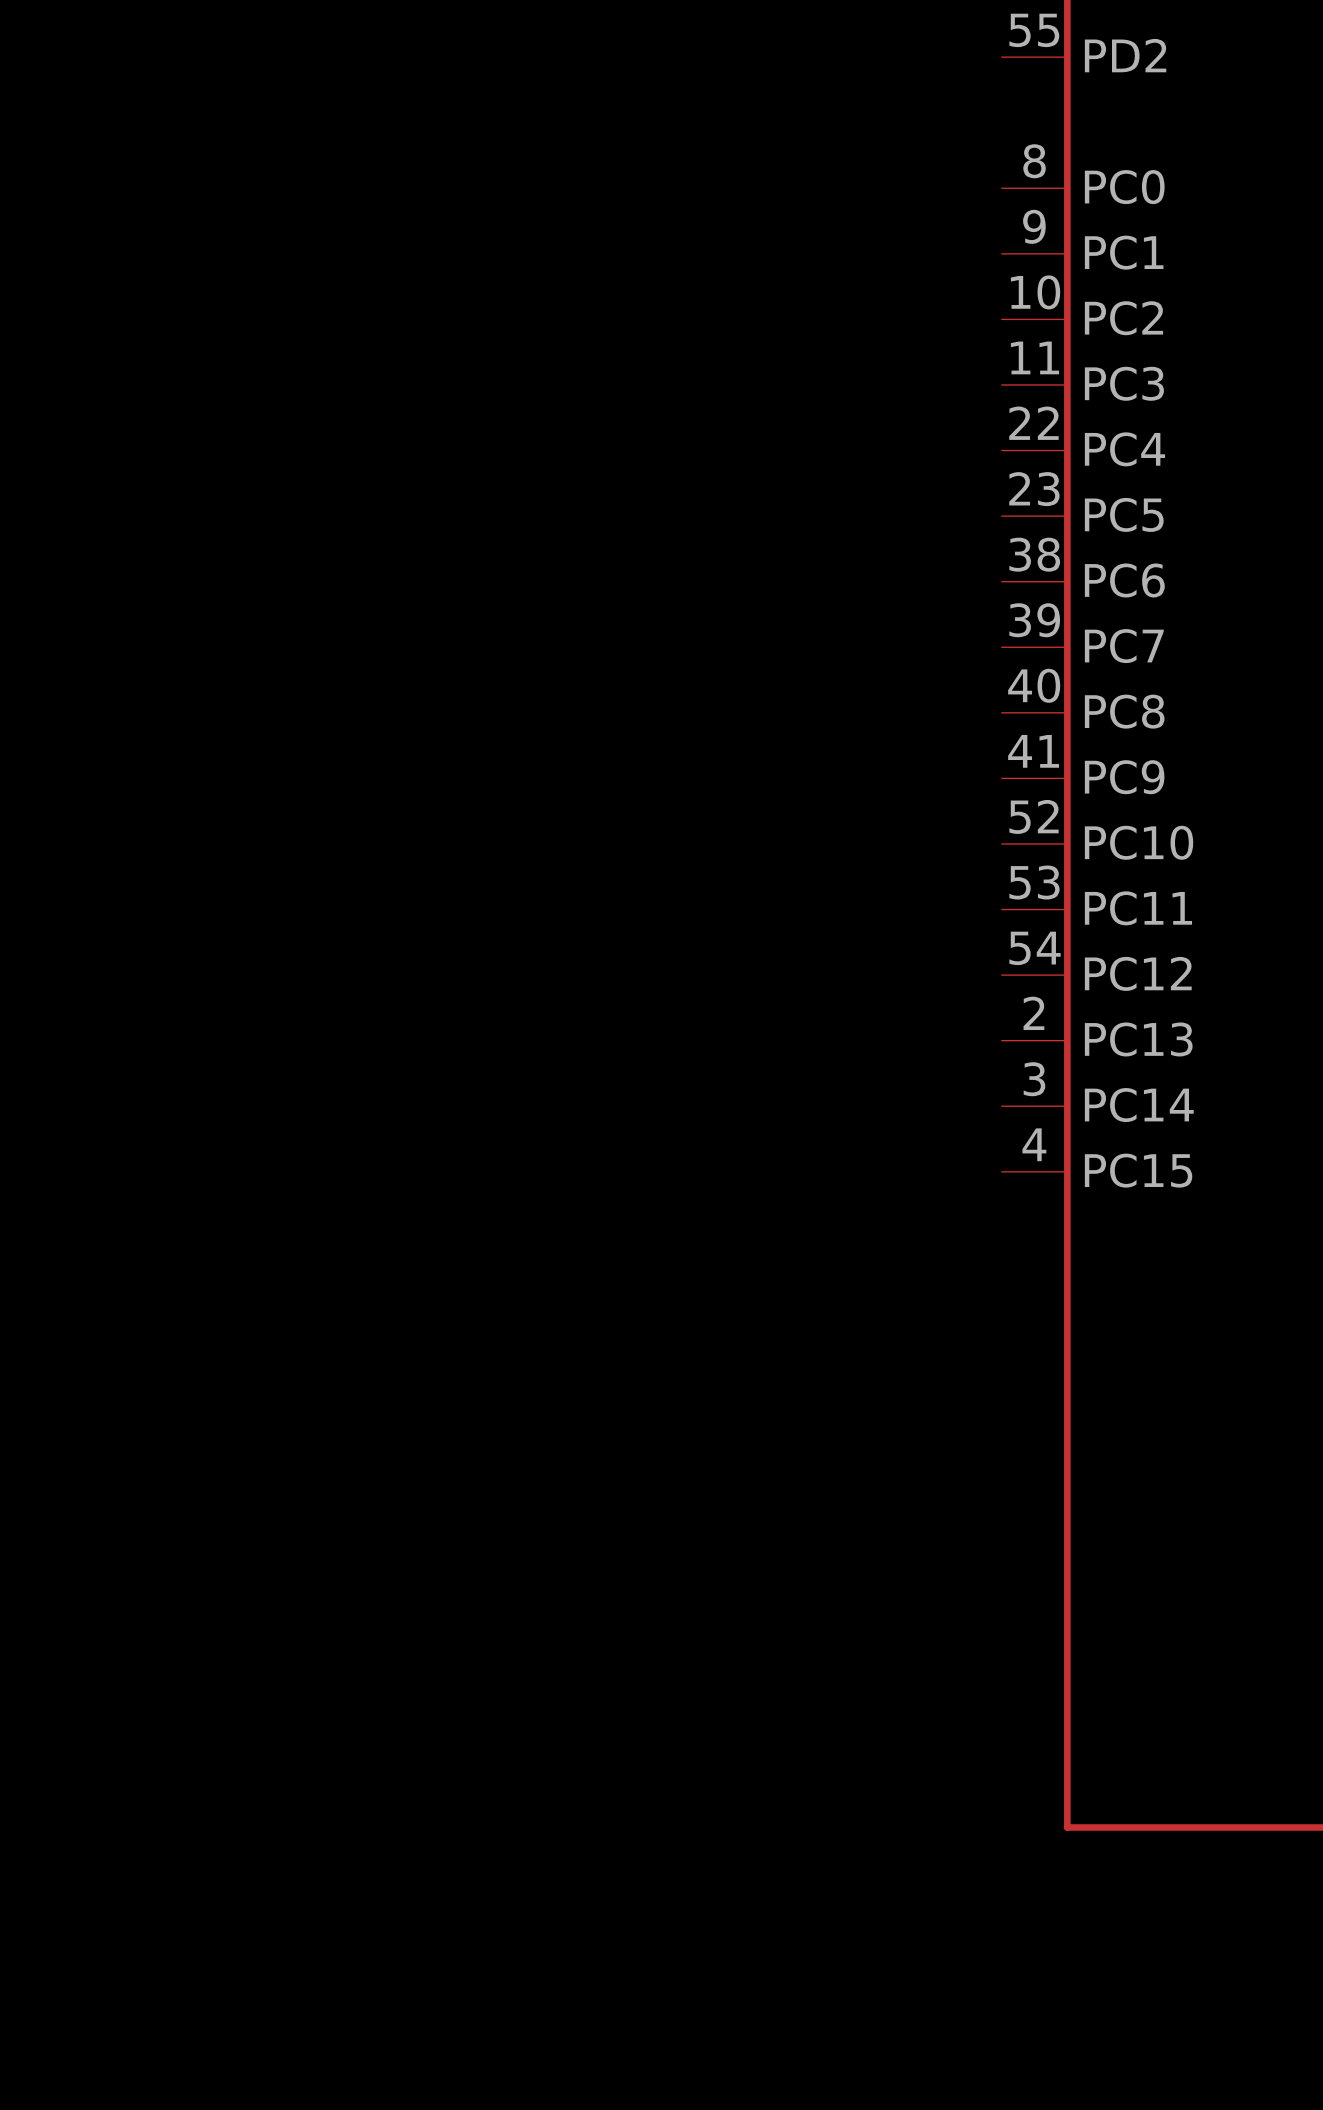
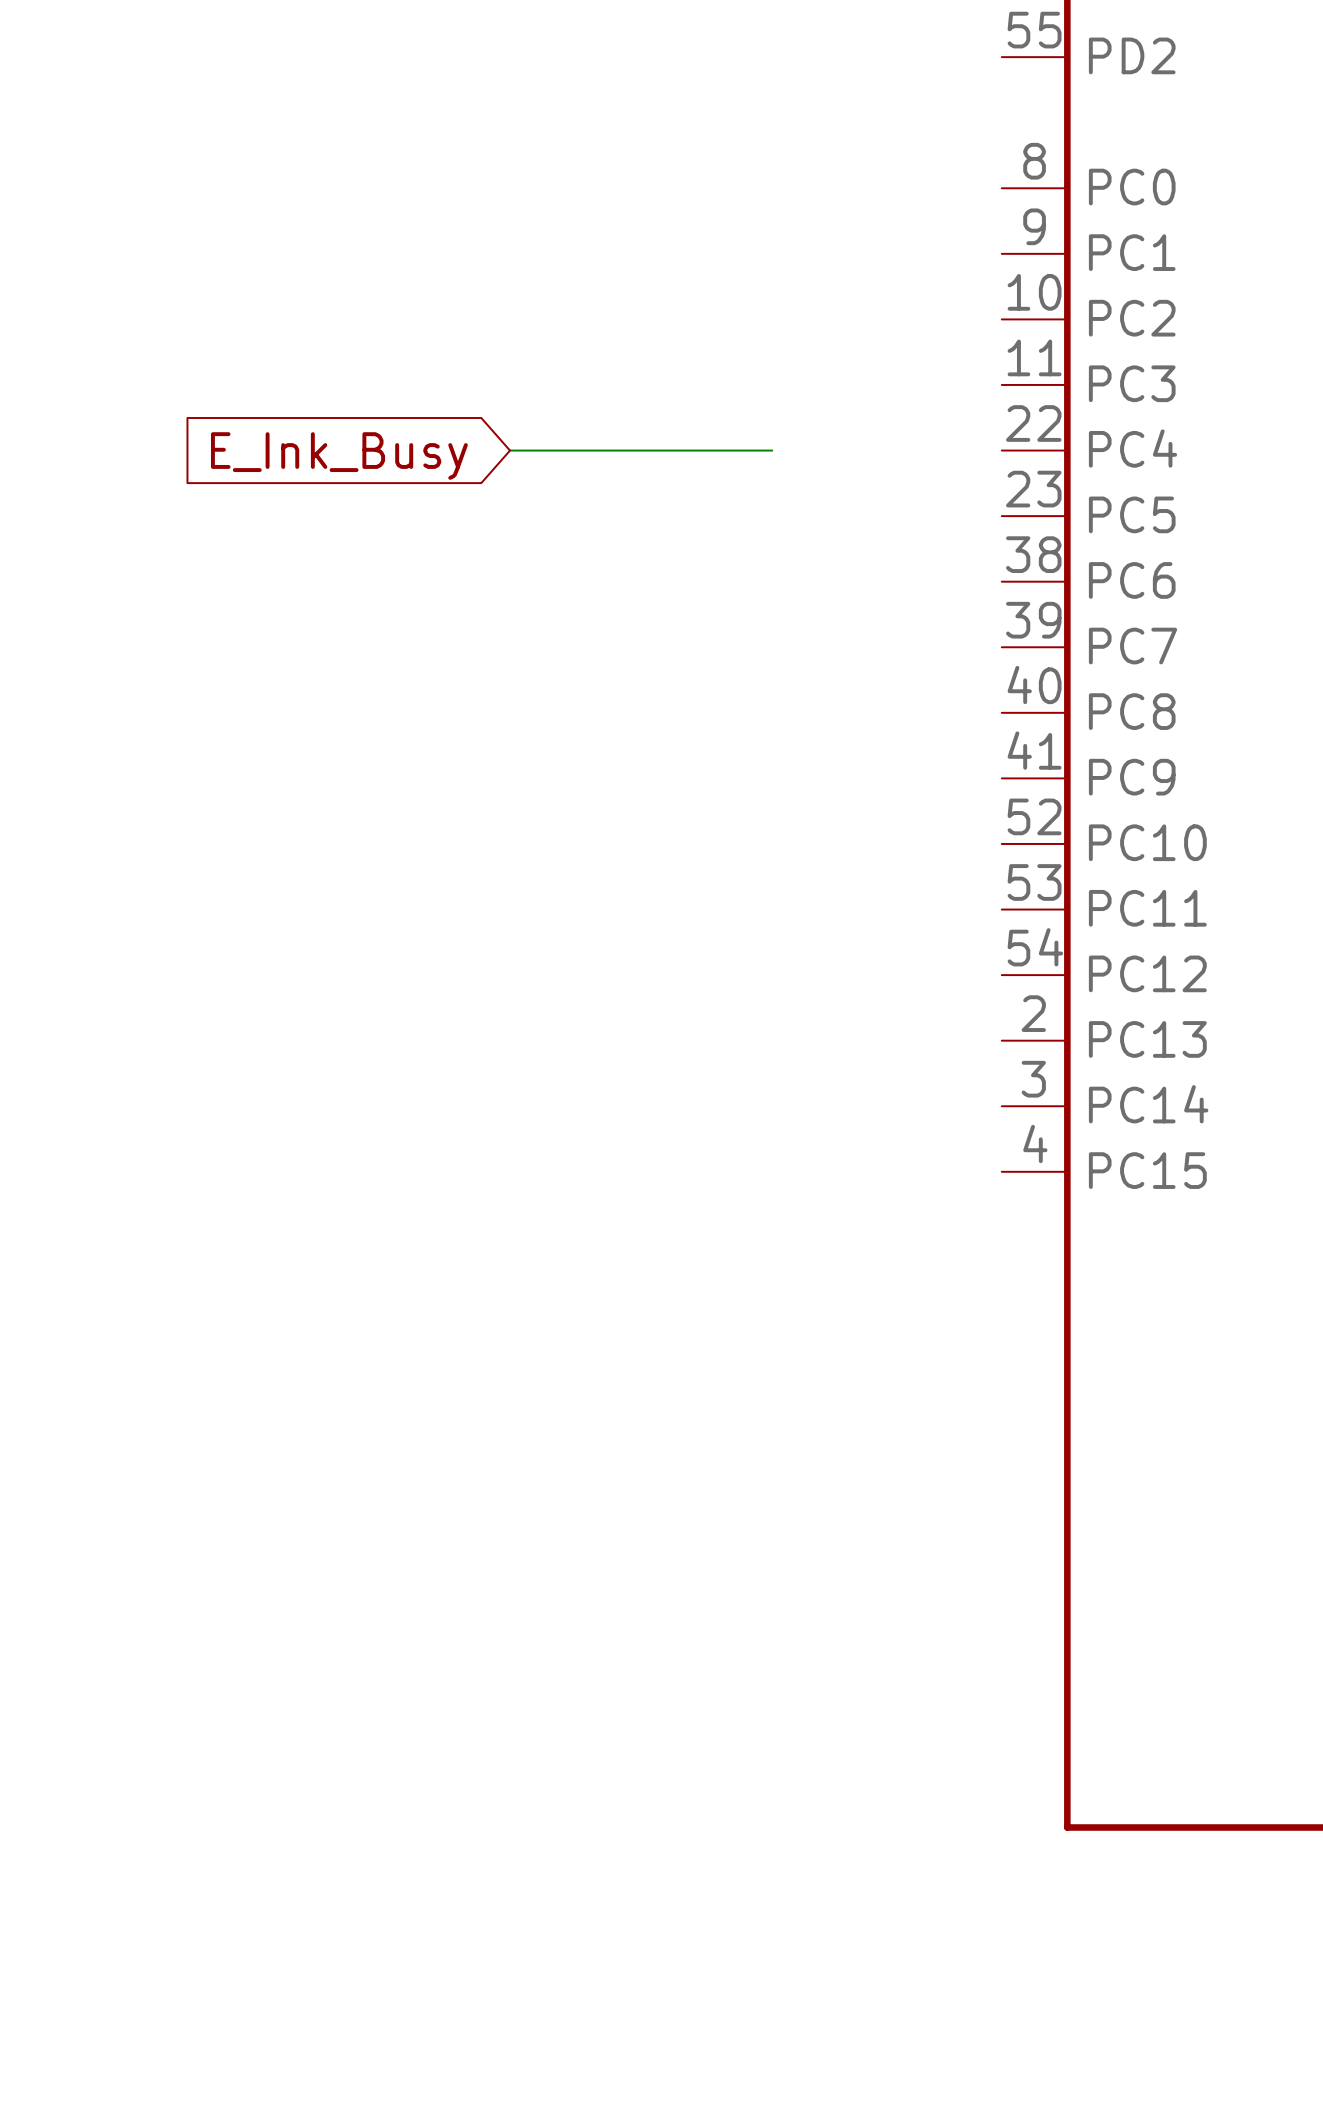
wire: none -> (510, 450) (772, 450)
global label: none -> E_Ink_Busy (339, 456)

